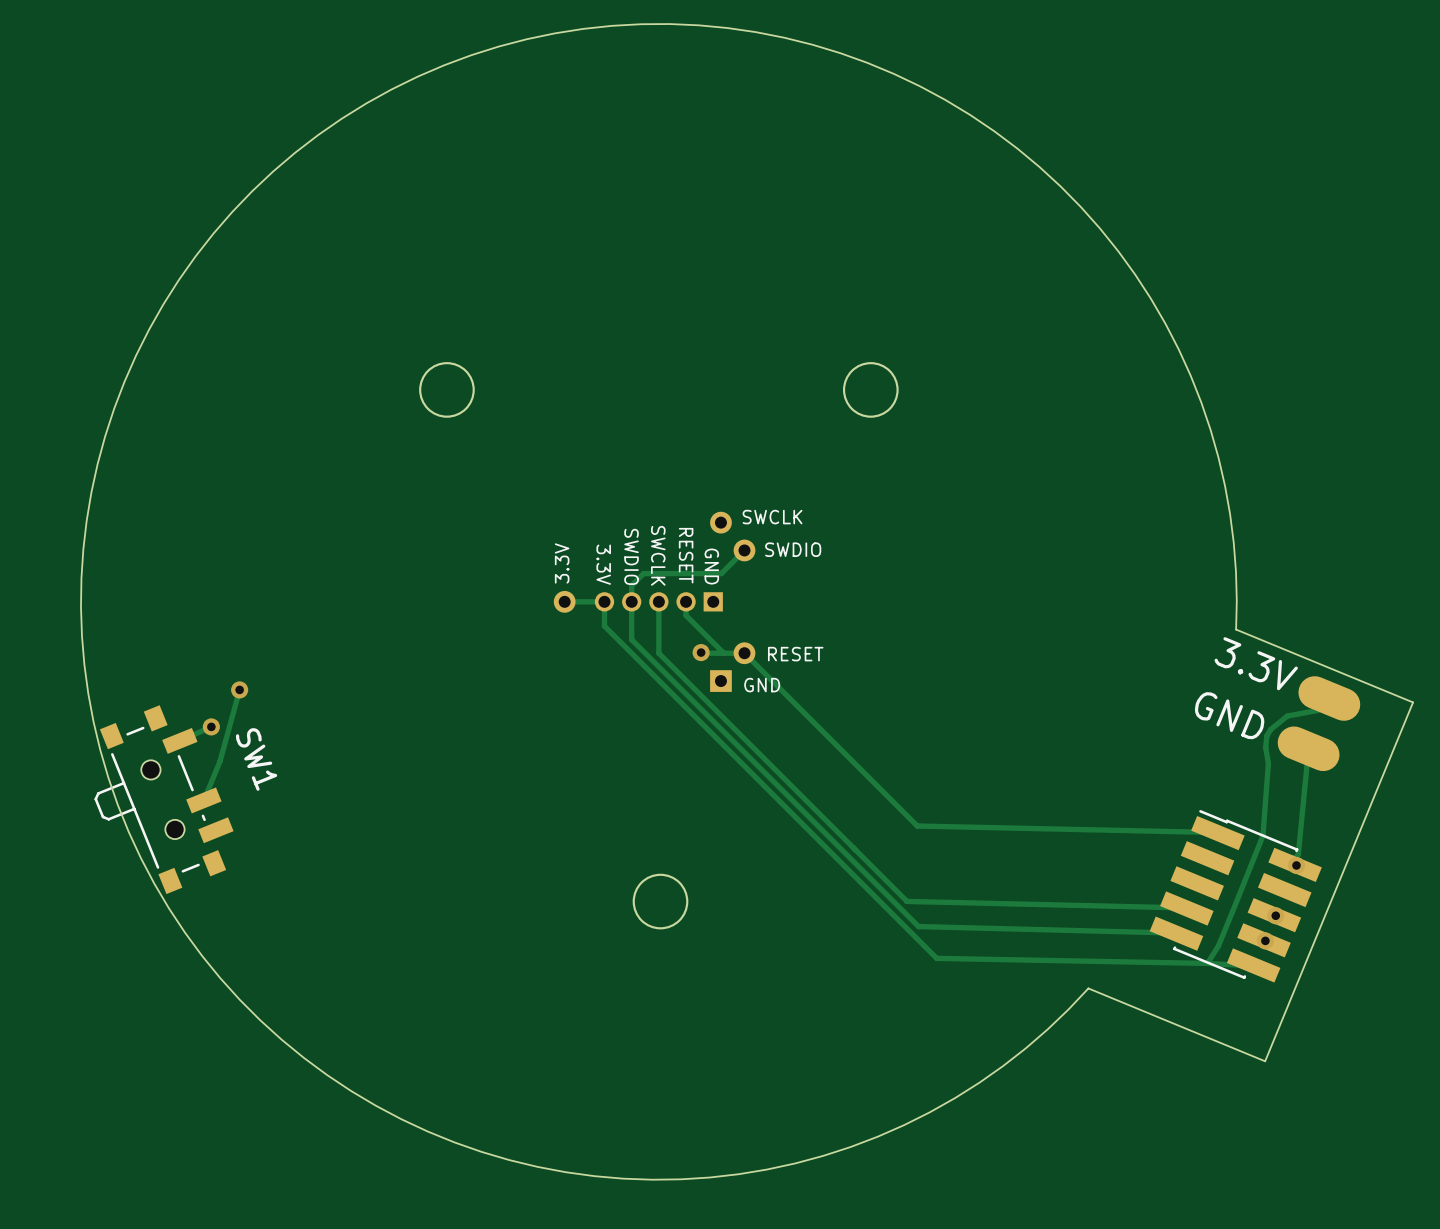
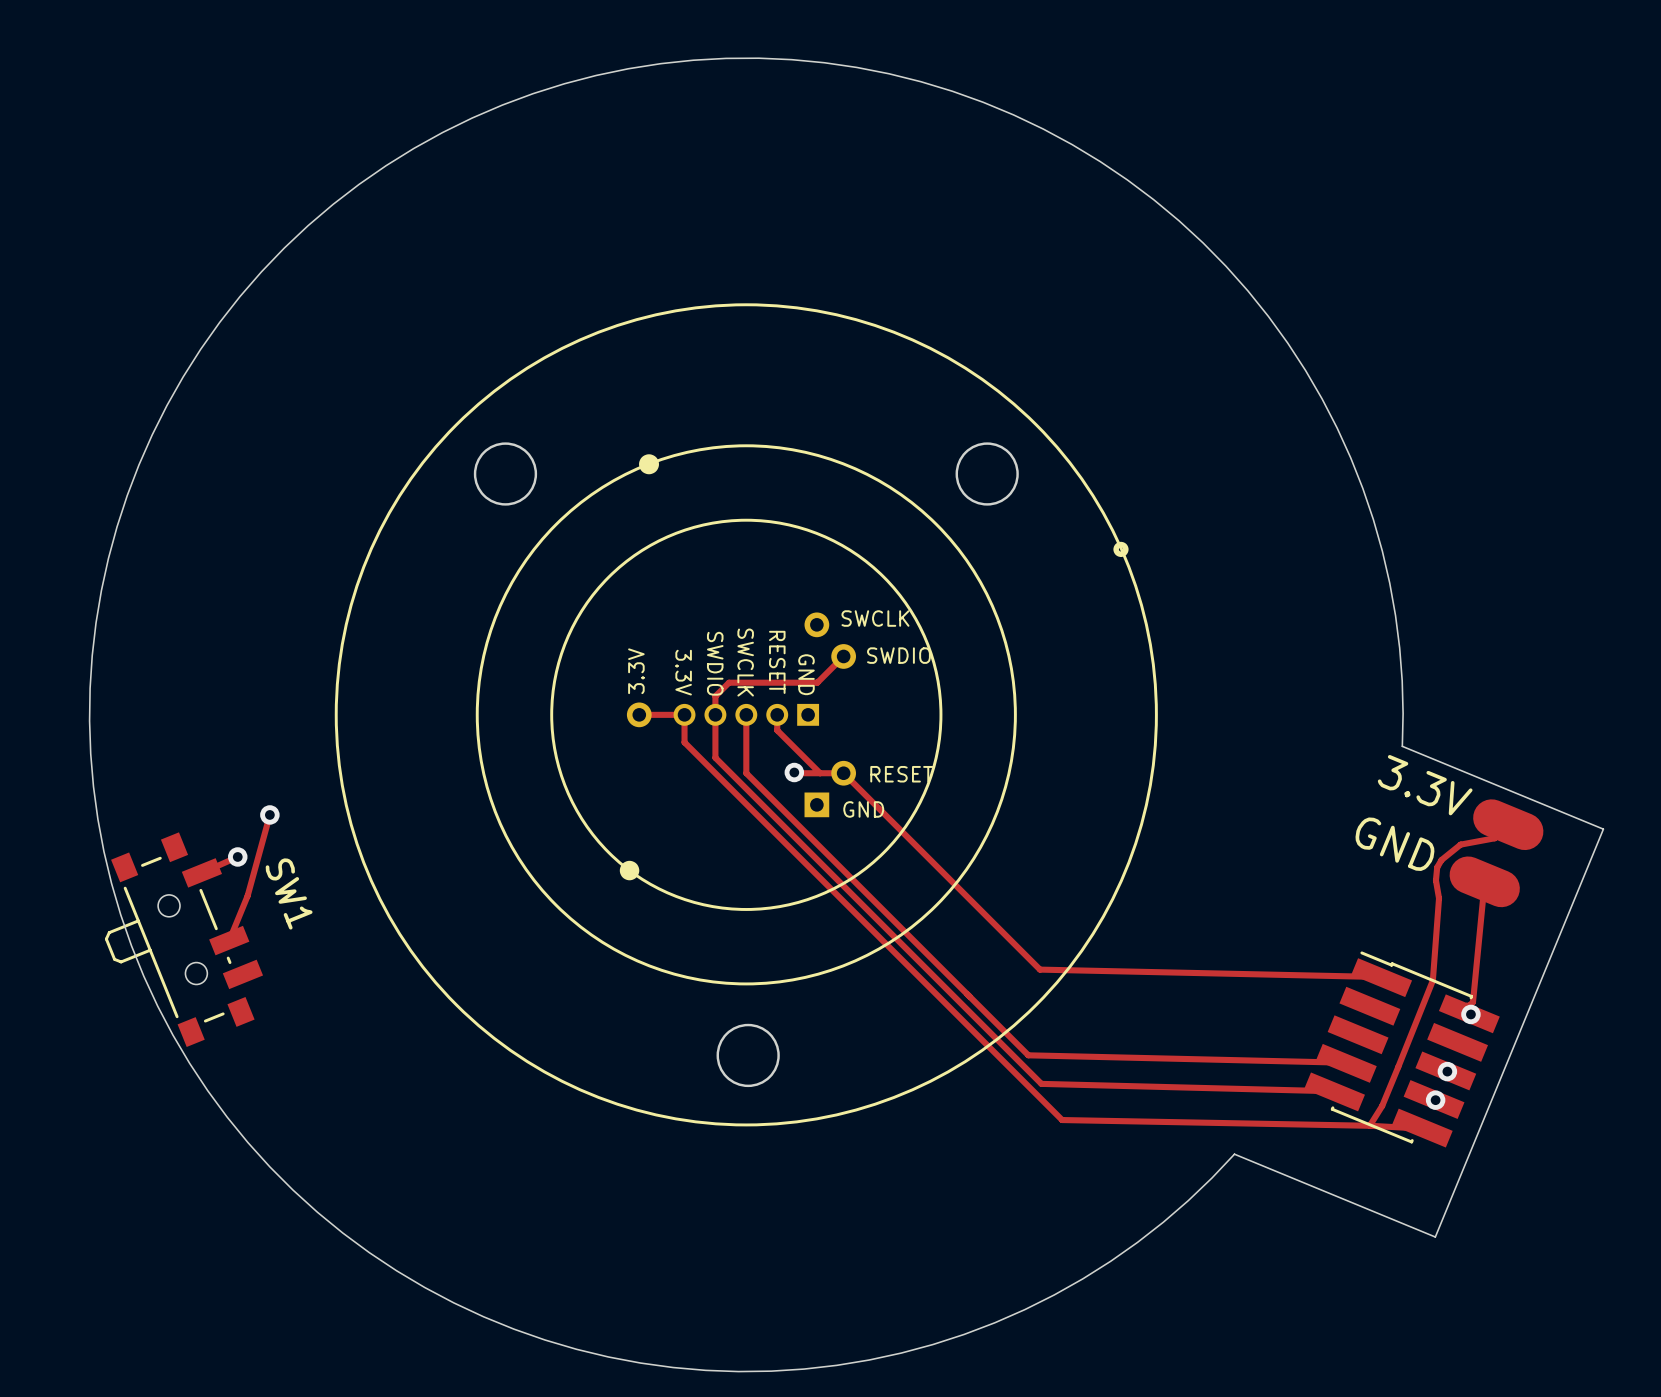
drawing: none -> [334, 303, 1158, 1127]

